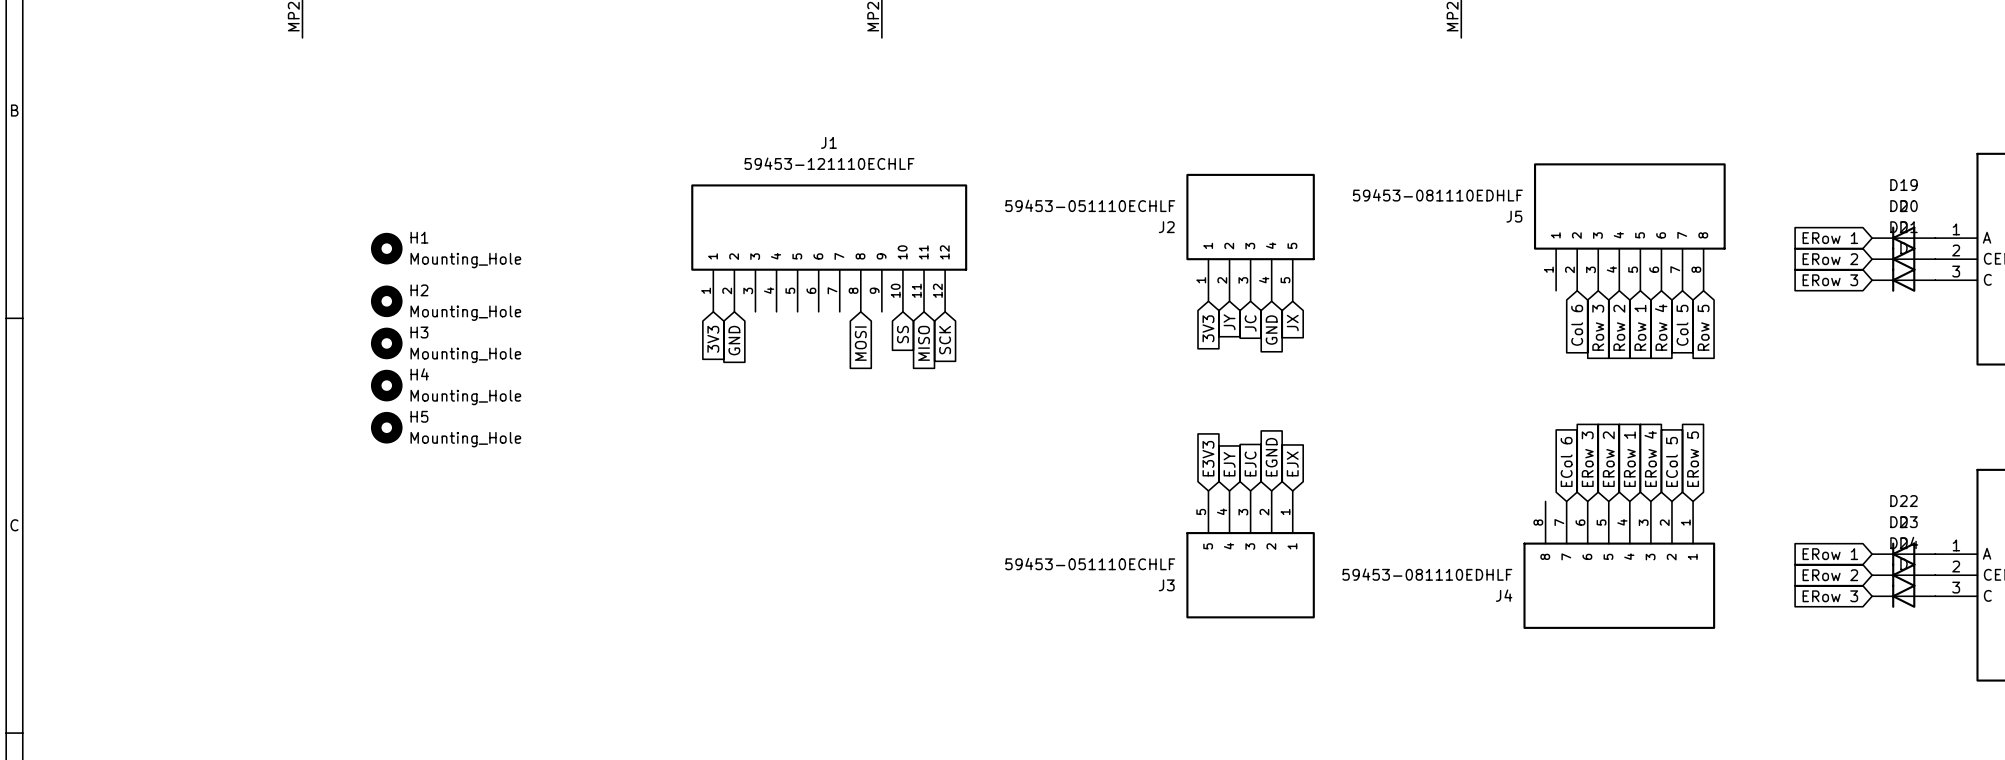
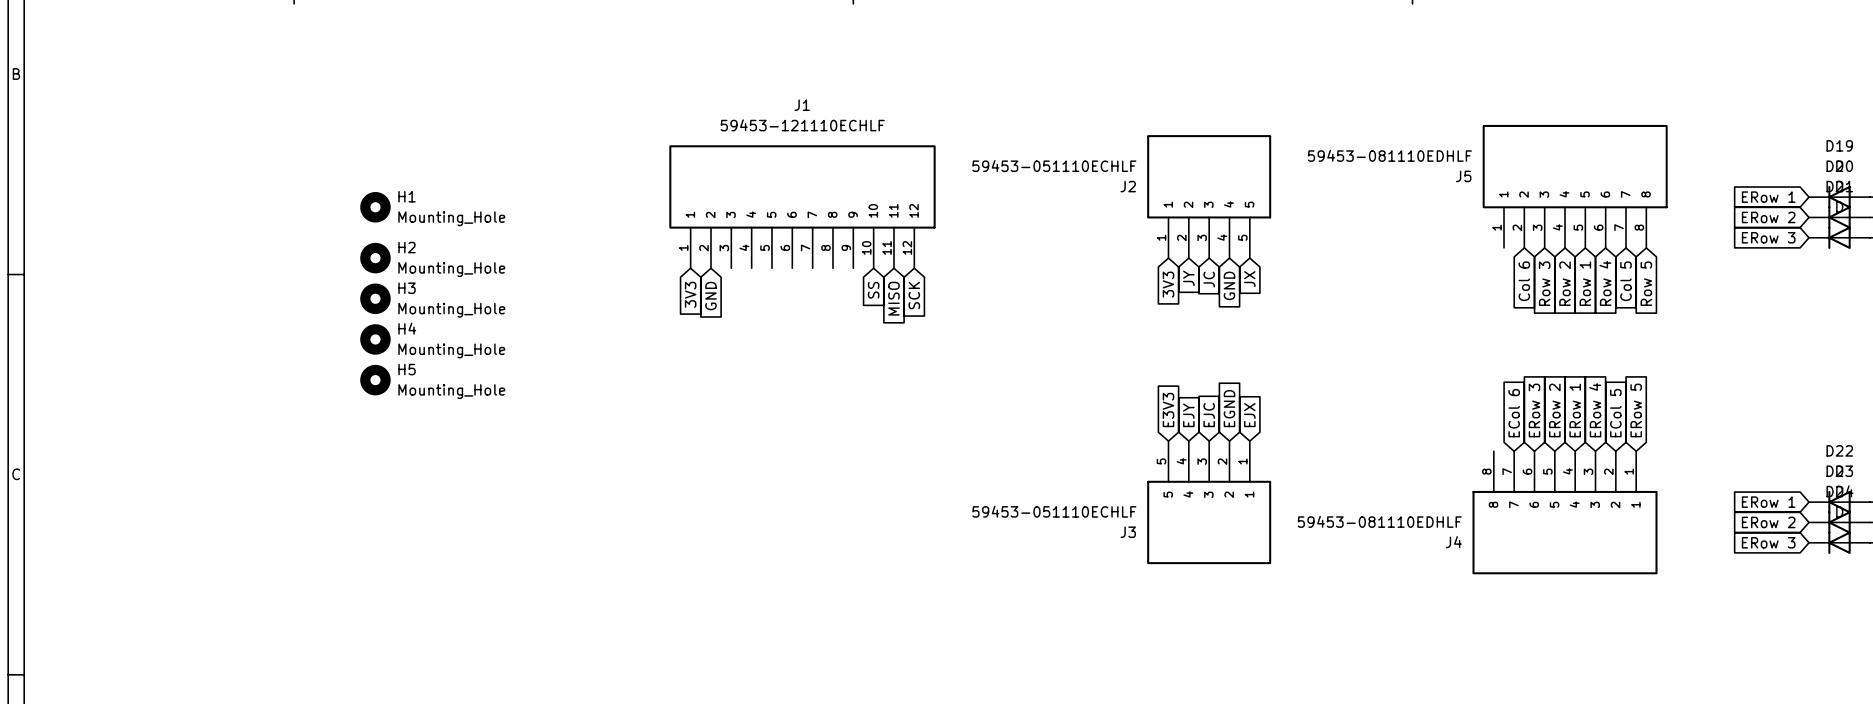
global label: MOSI (860, 343) -> none

